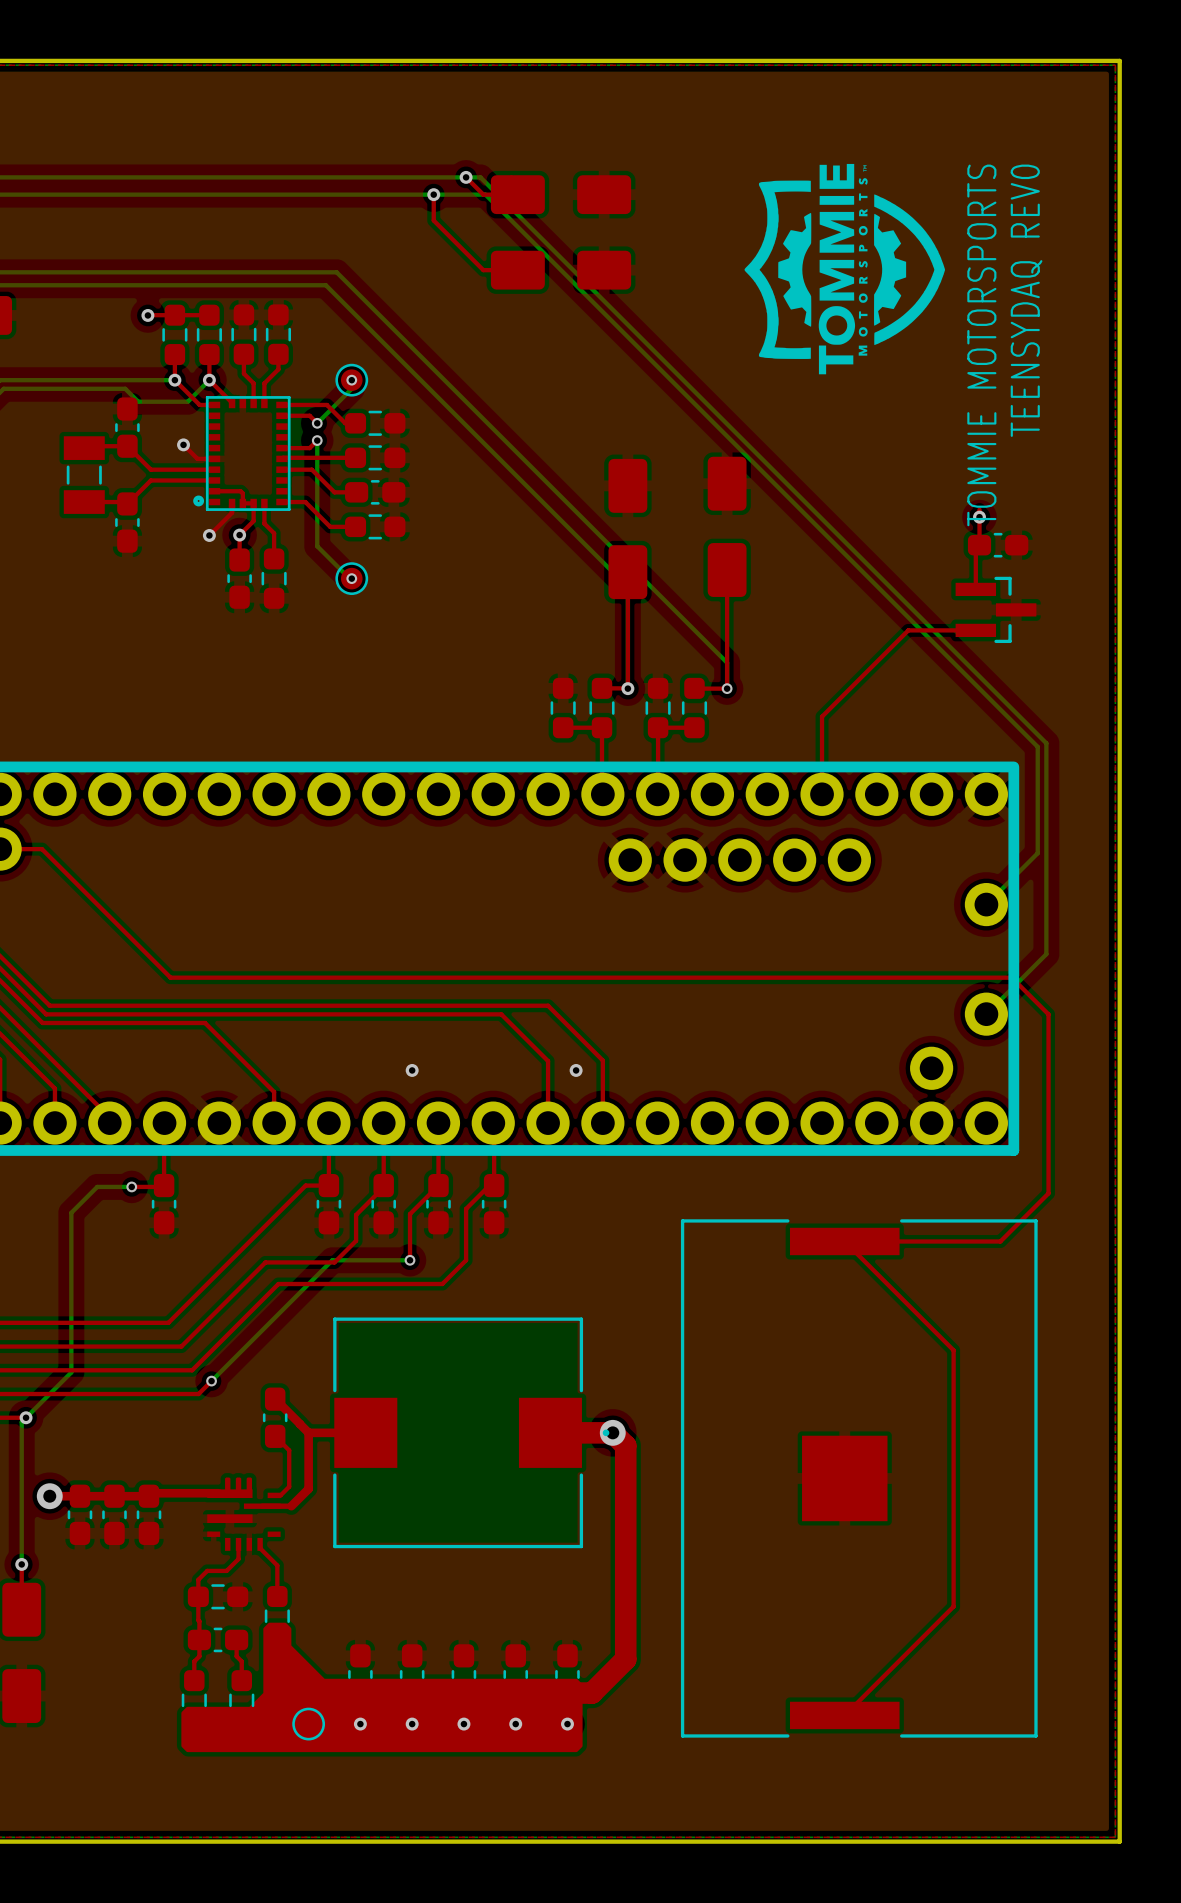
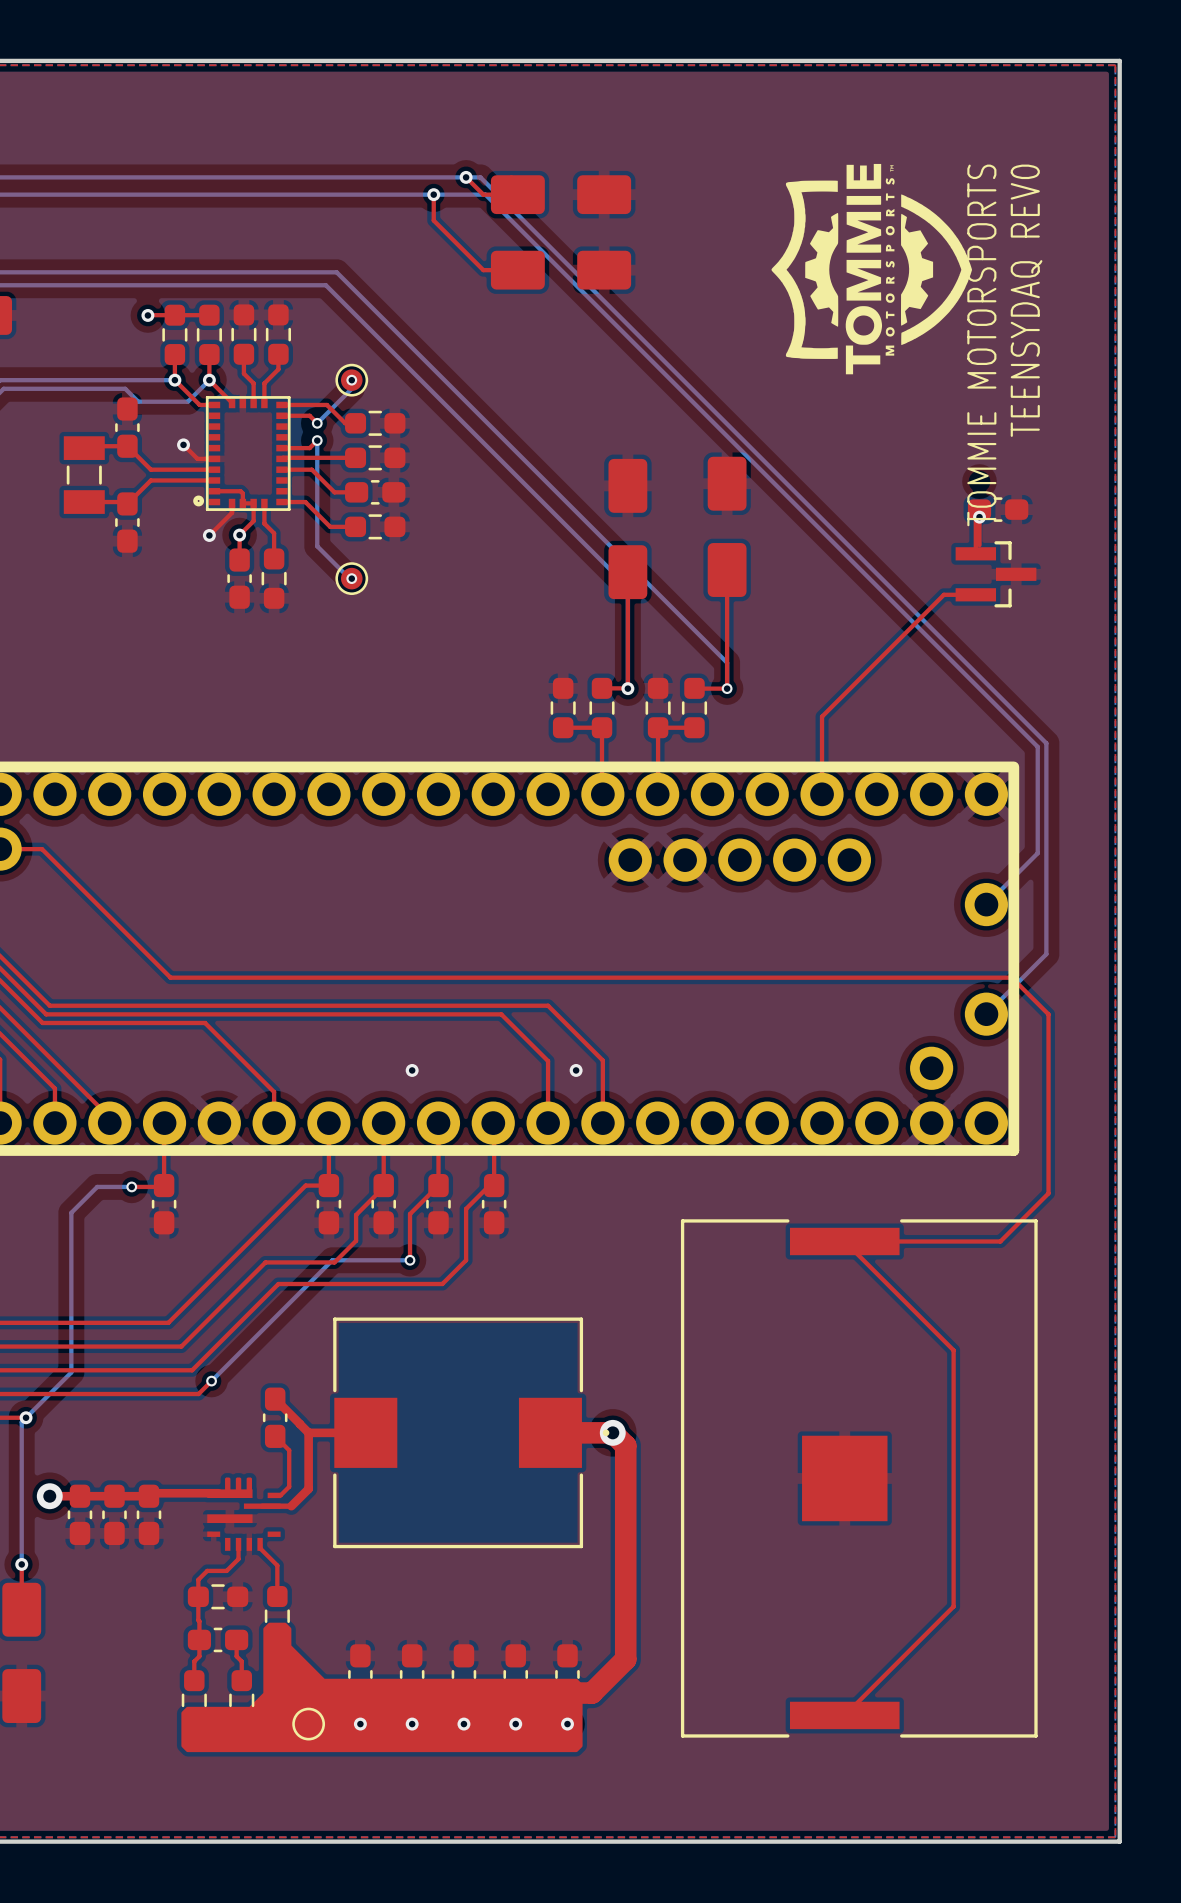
drawing position: (844, 269) -> (871, 269)
part position: (998, 545) -> (998, 509)
top track: (975, 553) (975, 589) -> (975, 515) (975, 551)
part position: (996, 609) -> (996, 574)
top track: (908, 630) (975, 630) -> (908, 630) (943, 594) (975, 594)

